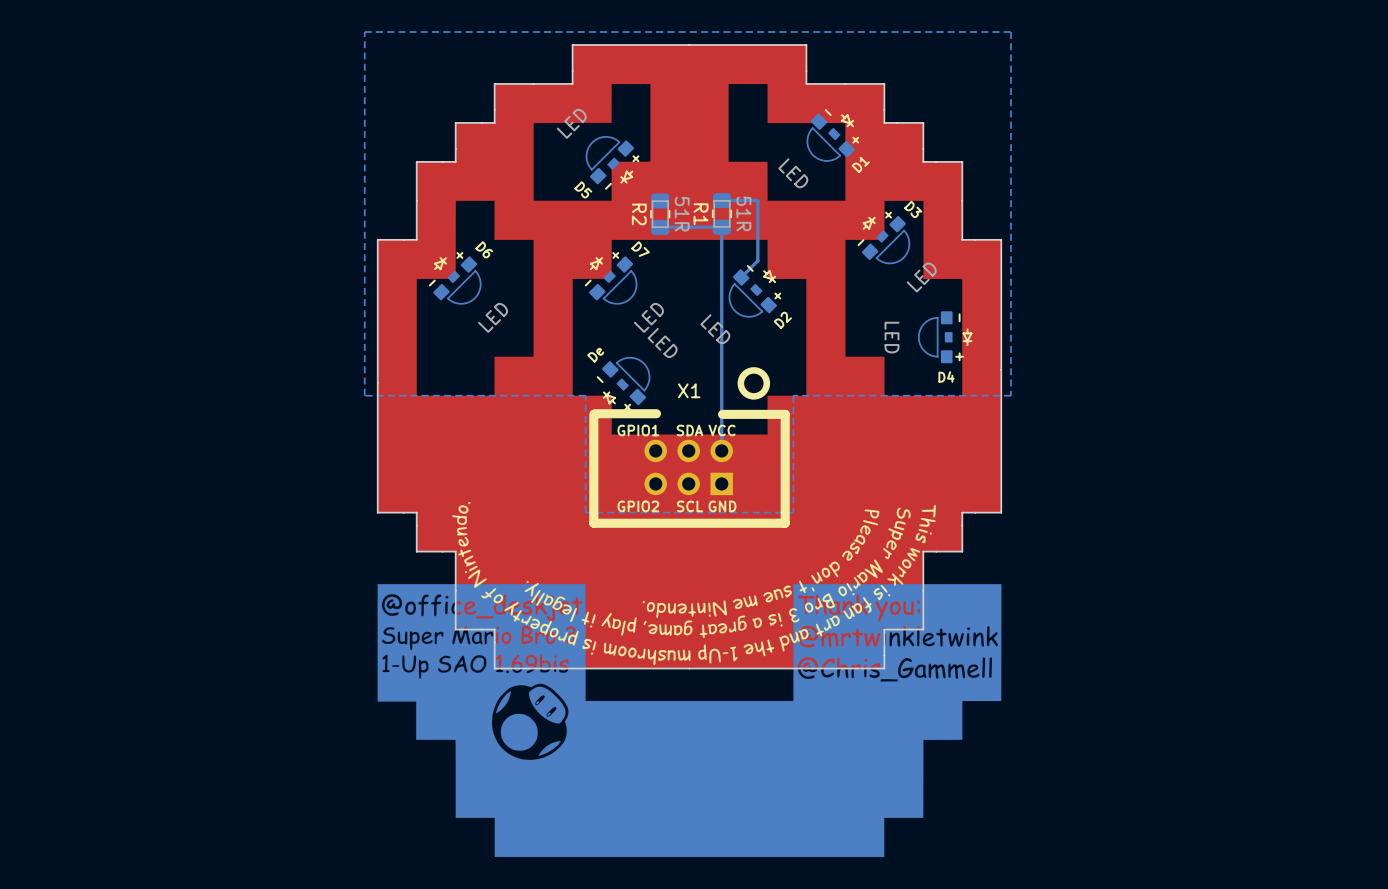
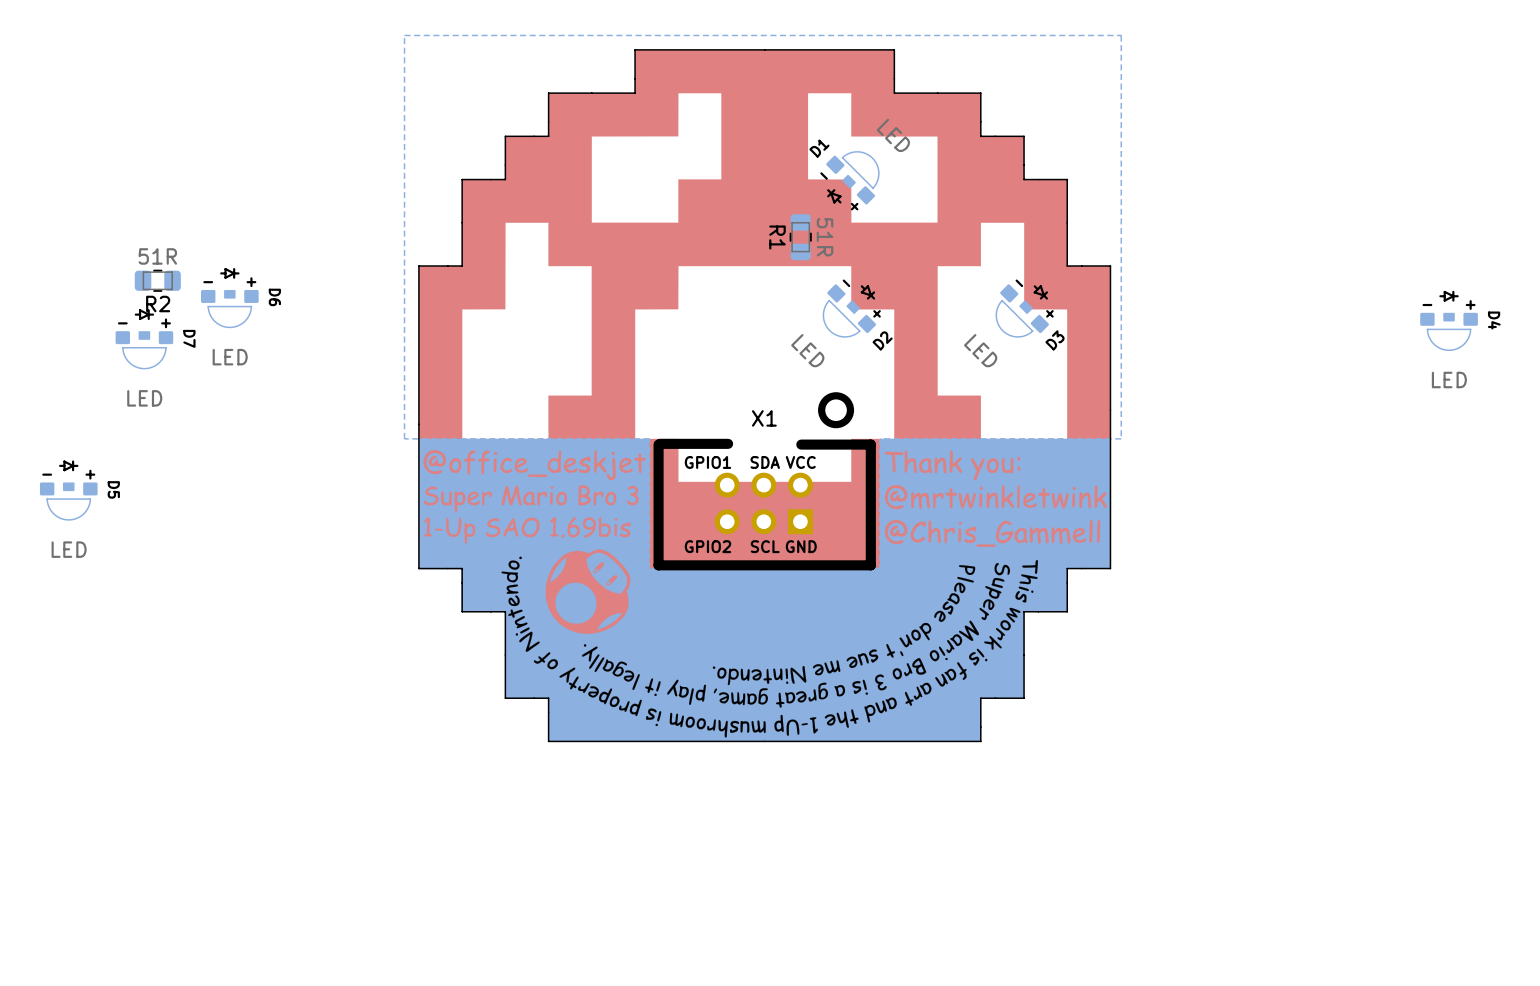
D1 rotation: 0° (830, 137) -> 180° (852, 177)
D1 position: (830, 137) -> (852, 177)
D5 rotation: 0° (609, 160) -> 135° counterclockwise (68, 490)
D5 position: (609, 160) -> (68, 490)
bottom track: (721, 200) (757, 200) (757, 260) (742, 275) -> none
R2 name position: R2 (639, 214) -> R2 (158, 303)
R2 rotation: 0° (660, 214) -> 90° clockwise (157, 280)
R2 position: (660, 214) -> (157, 280)
R2 value position: 51R (682, 214) -> 51R (157, 256)
bottom track: (660, 227) (721, 227) (721, 450) -> none
D3 rotation: 0° (885, 240) -> 90° clockwise (1022, 310)
D3 position: (885, 240) -> (1022, 310)
D6 rotation: 0° (457, 280) -> 45° clockwise (229, 298)
D6 position: (457, 280) -> (229, 298)
D7 rotation: 0° (613, 280) -> 45° clockwise (144, 339)
D7 position: (613, 280) -> (144, 339)
D2 position: (752, 293) -> (849, 310)
D4 rotation: 0° (945, 337) -> 90° counterclockwise (1449, 320)
D4 position: (945, 337) -> (1449, 320)
De: LED (626, 381) -> none
X1 position: (689, 447) -> (764, 481)
drawing position: (689, 720) -> (764, 590)

